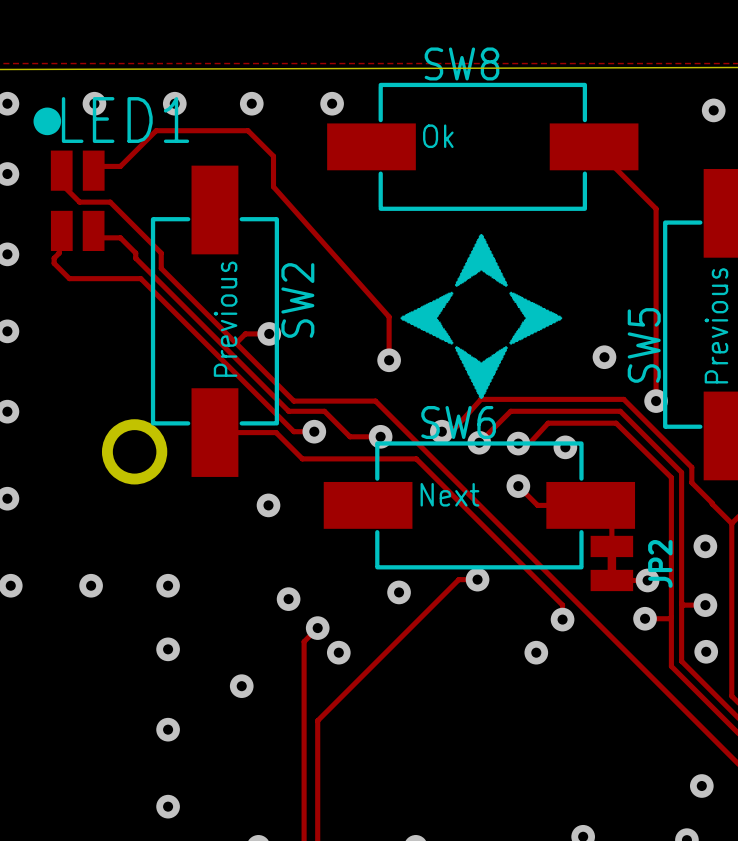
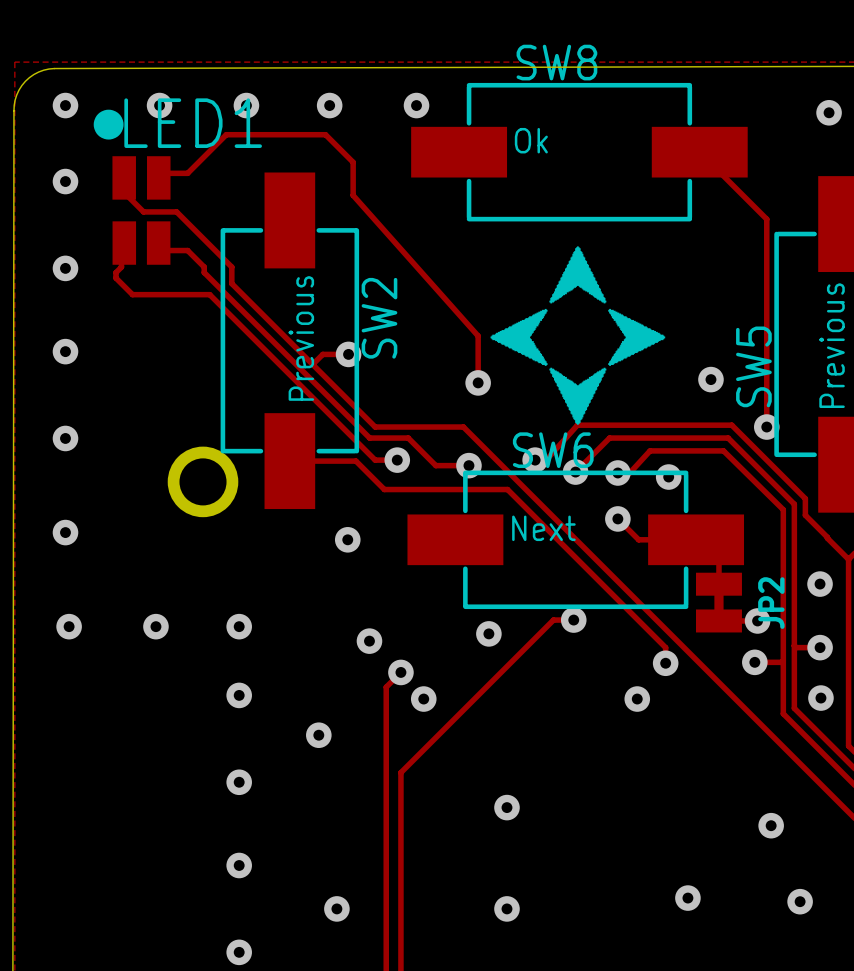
via: none -> (506, 807)
via position: (701, 786) -> (771, 825)

